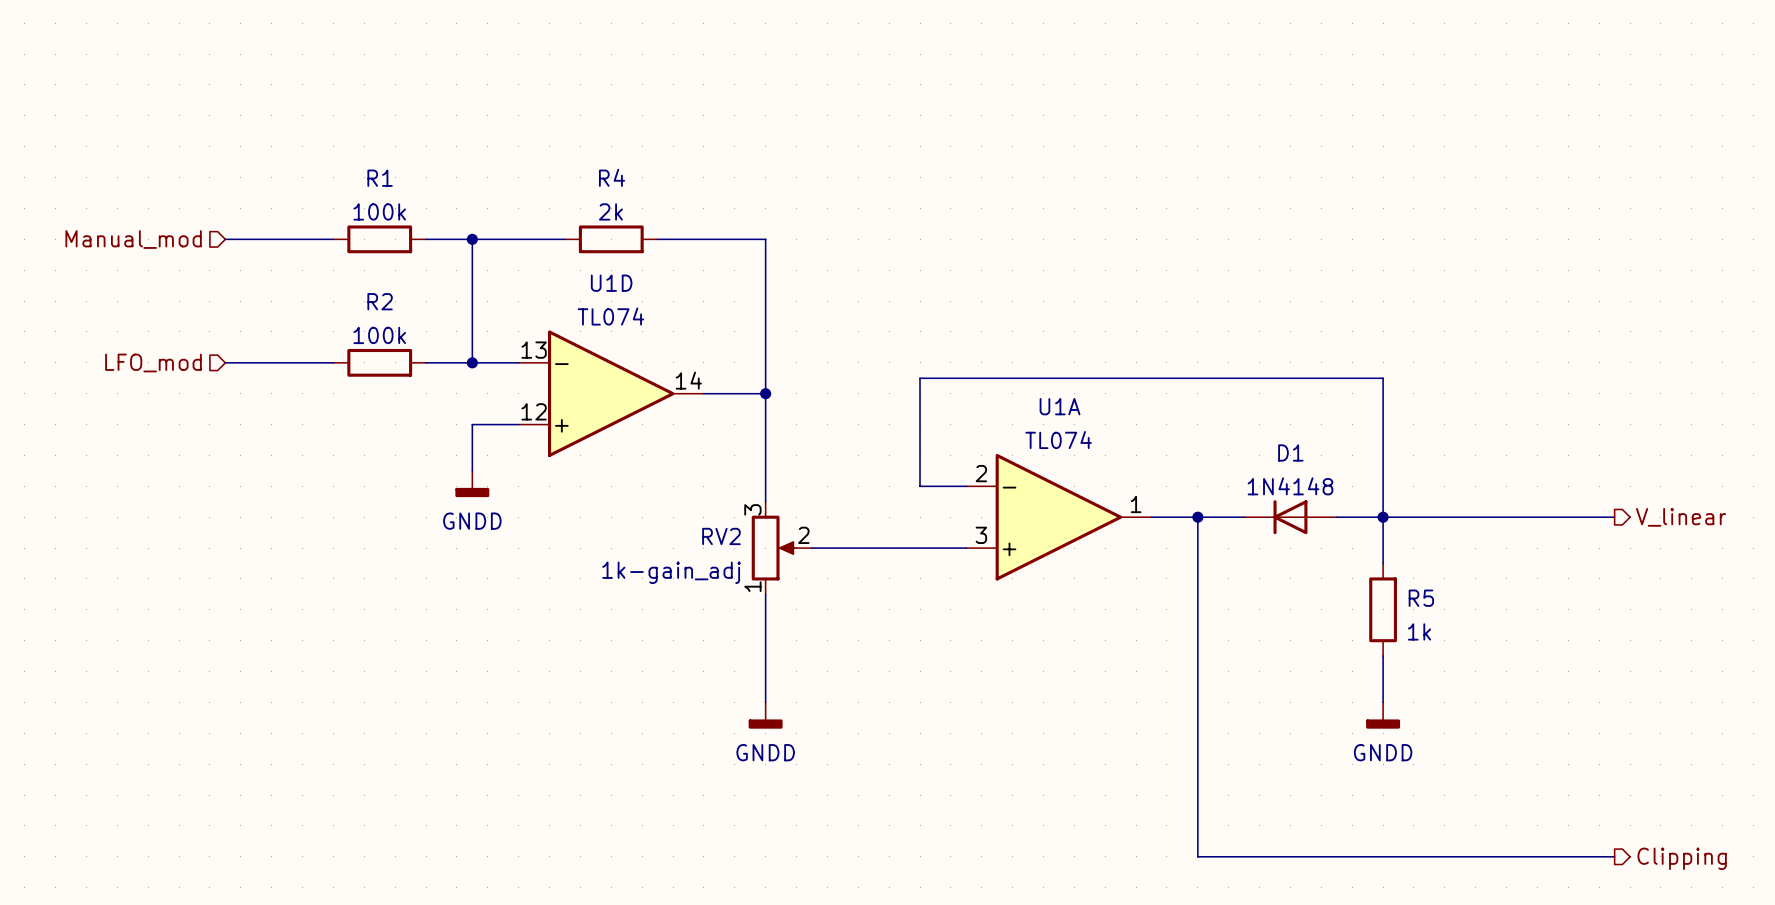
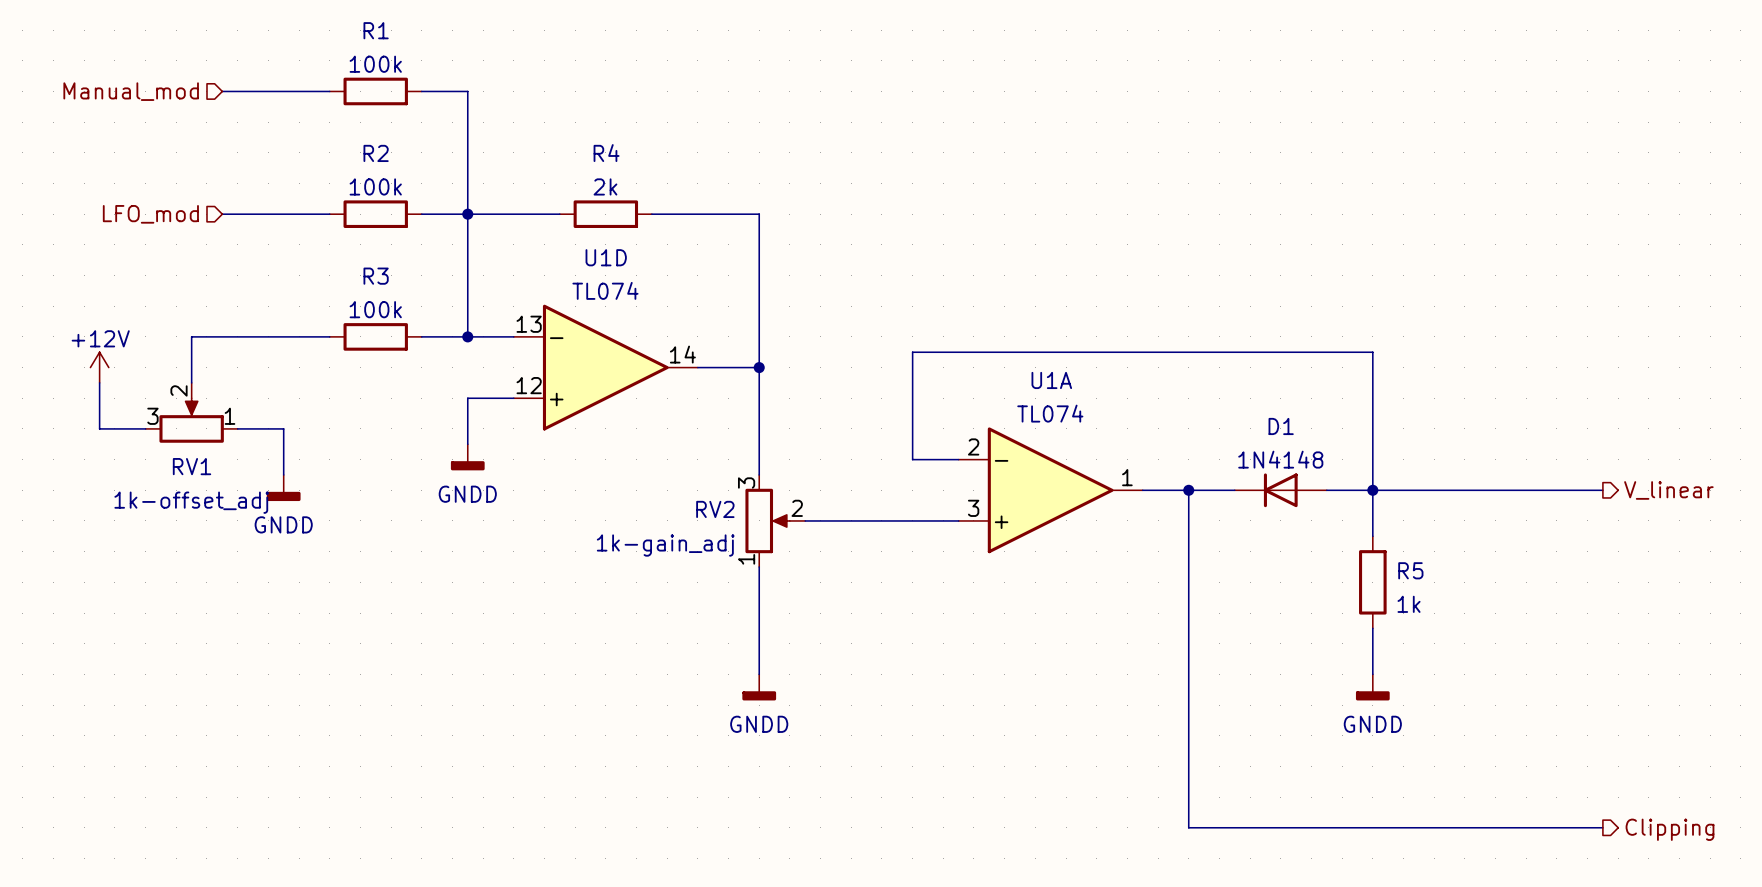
wire: none -> (222, 91) (329, 91)
R1: none -> 100k (375, 91)
wire: none -> (421, 91) (467, 91) (467, 214)
hierarchical label: none -> Manual_mod (131, 91)
R1 name: R1 (380, 178) -> R2 (376, 153)
hierarchical label: Manual_mod (133, 239) -> LFO_mod (150, 214)
R2 name: R2 (380, 301) -> R3 (376, 276)
wire: none -> (222, 336) (191, 336) (191, 382)
hierarchical label: LFO_mod (153, 363) -> none
power symbol: none -> +12V (99, 367)
wire: none -> (99, 382) (99, 428) (145, 428)
RV1: none -> 1k-offset_adj (191, 412)
wire: none -> (237, 428) (283, 428) (283, 474)
power symbol: none -> GNDD (283, 488)

